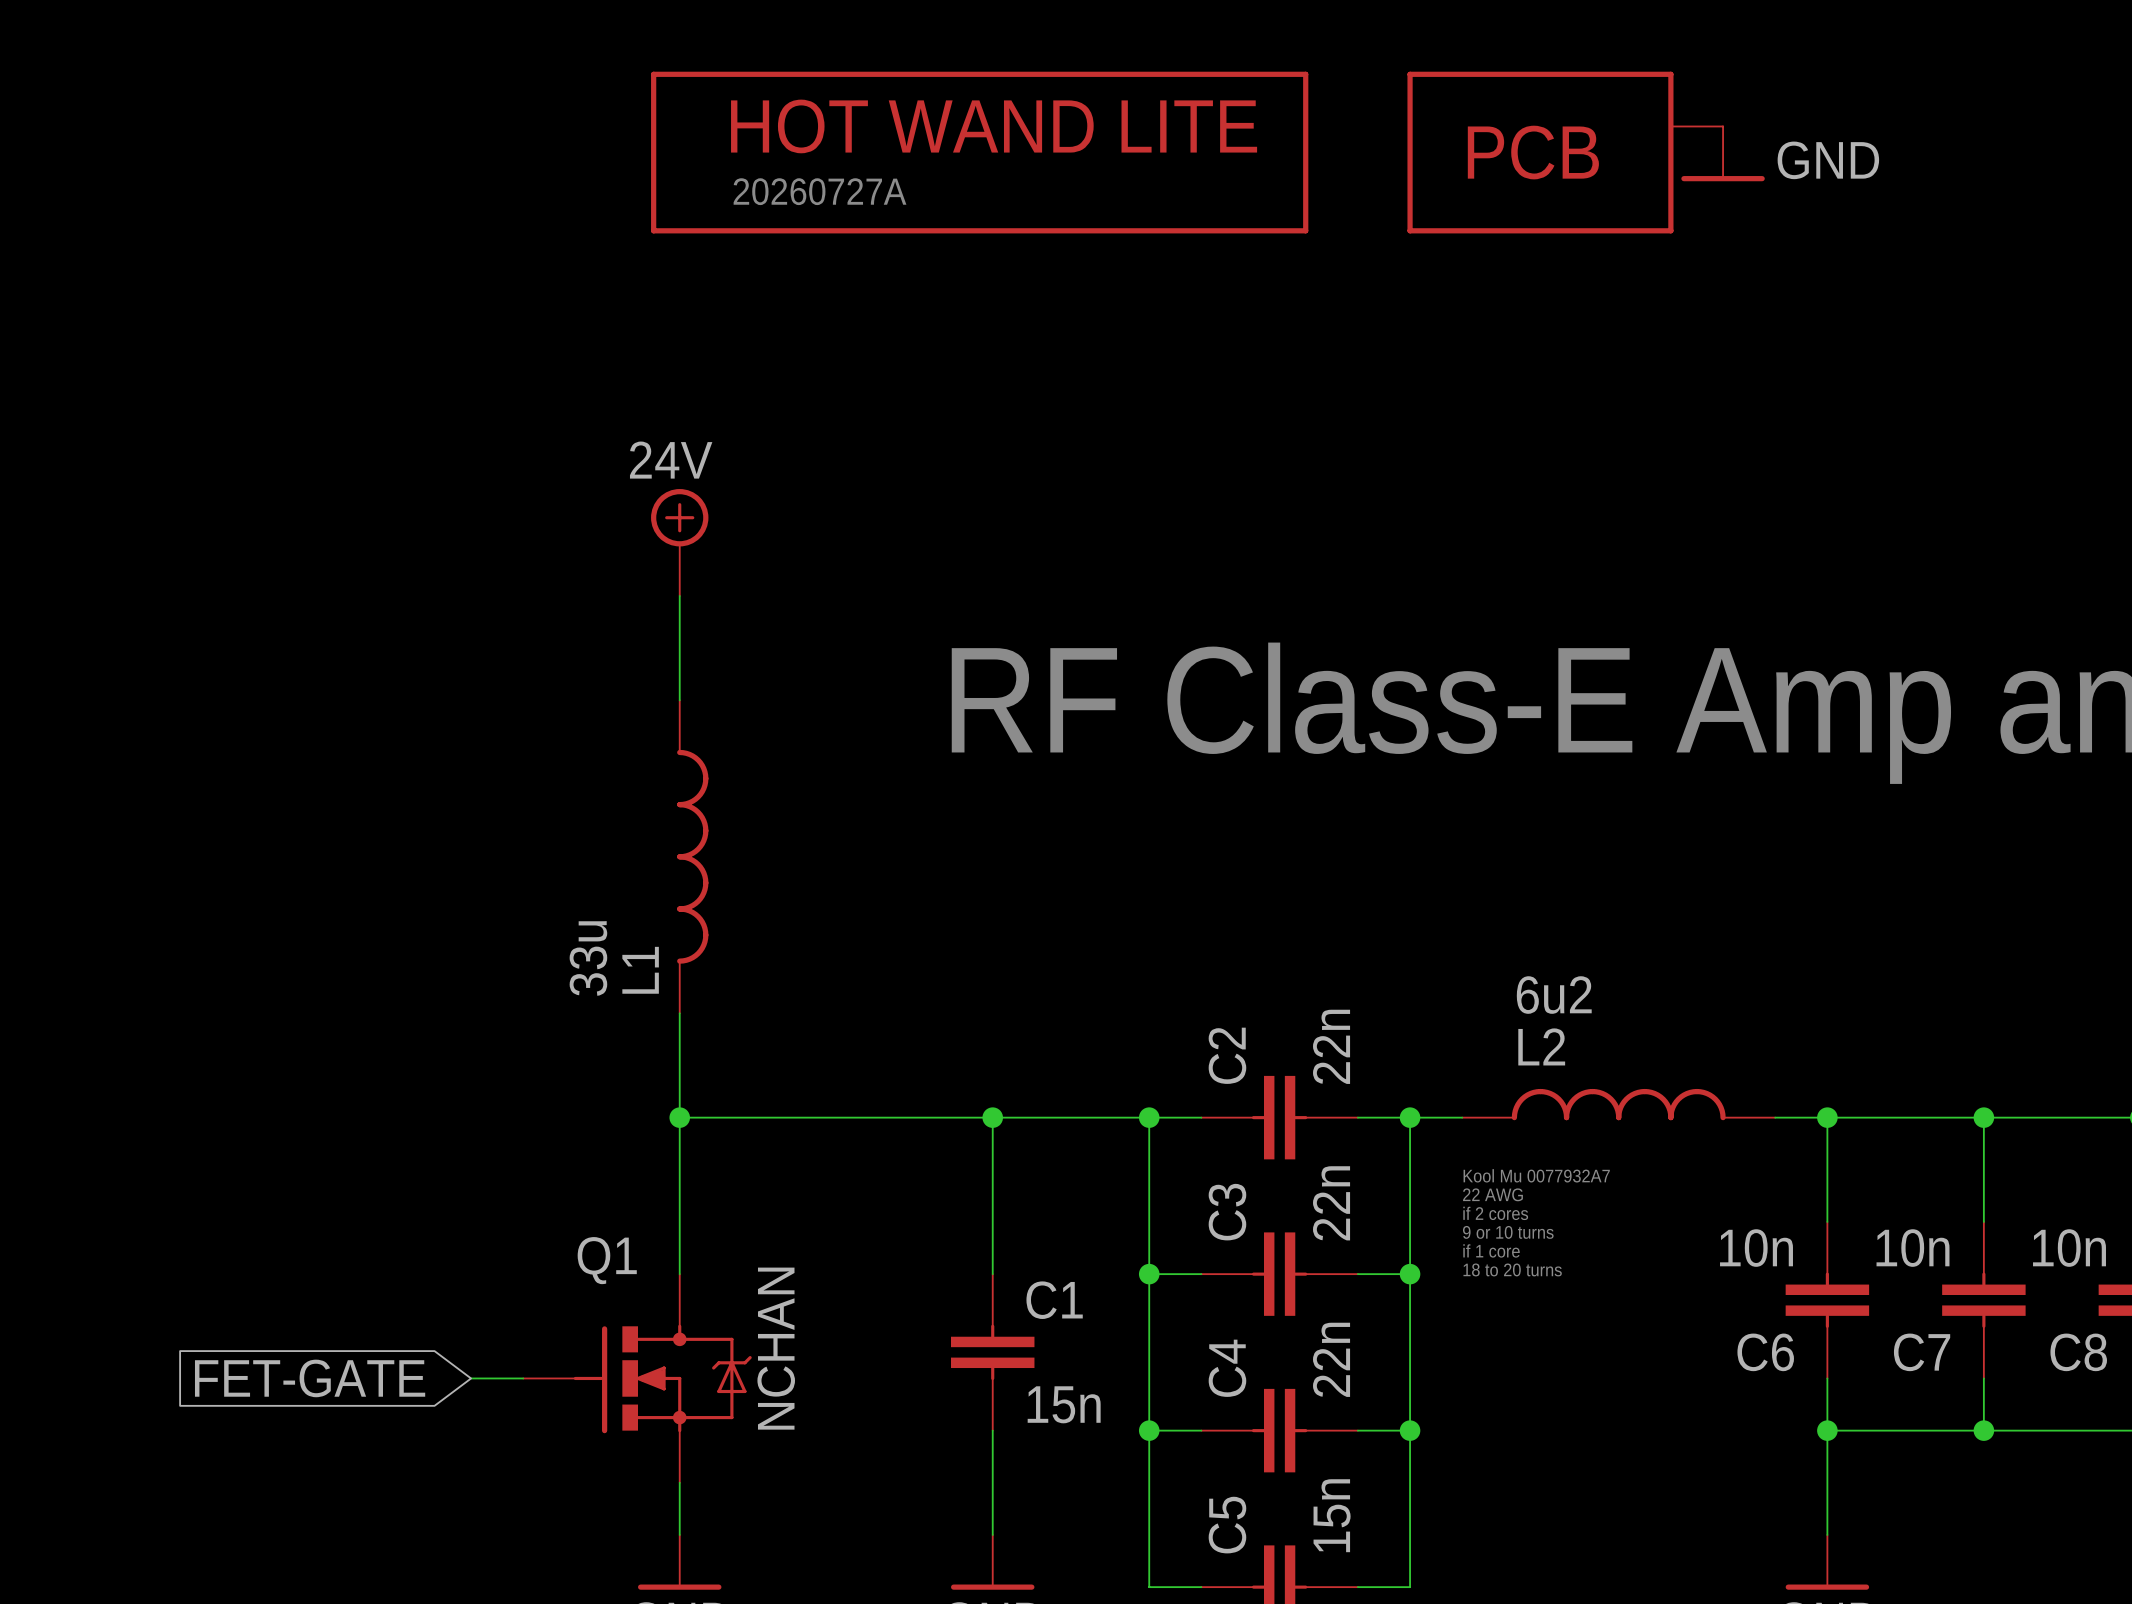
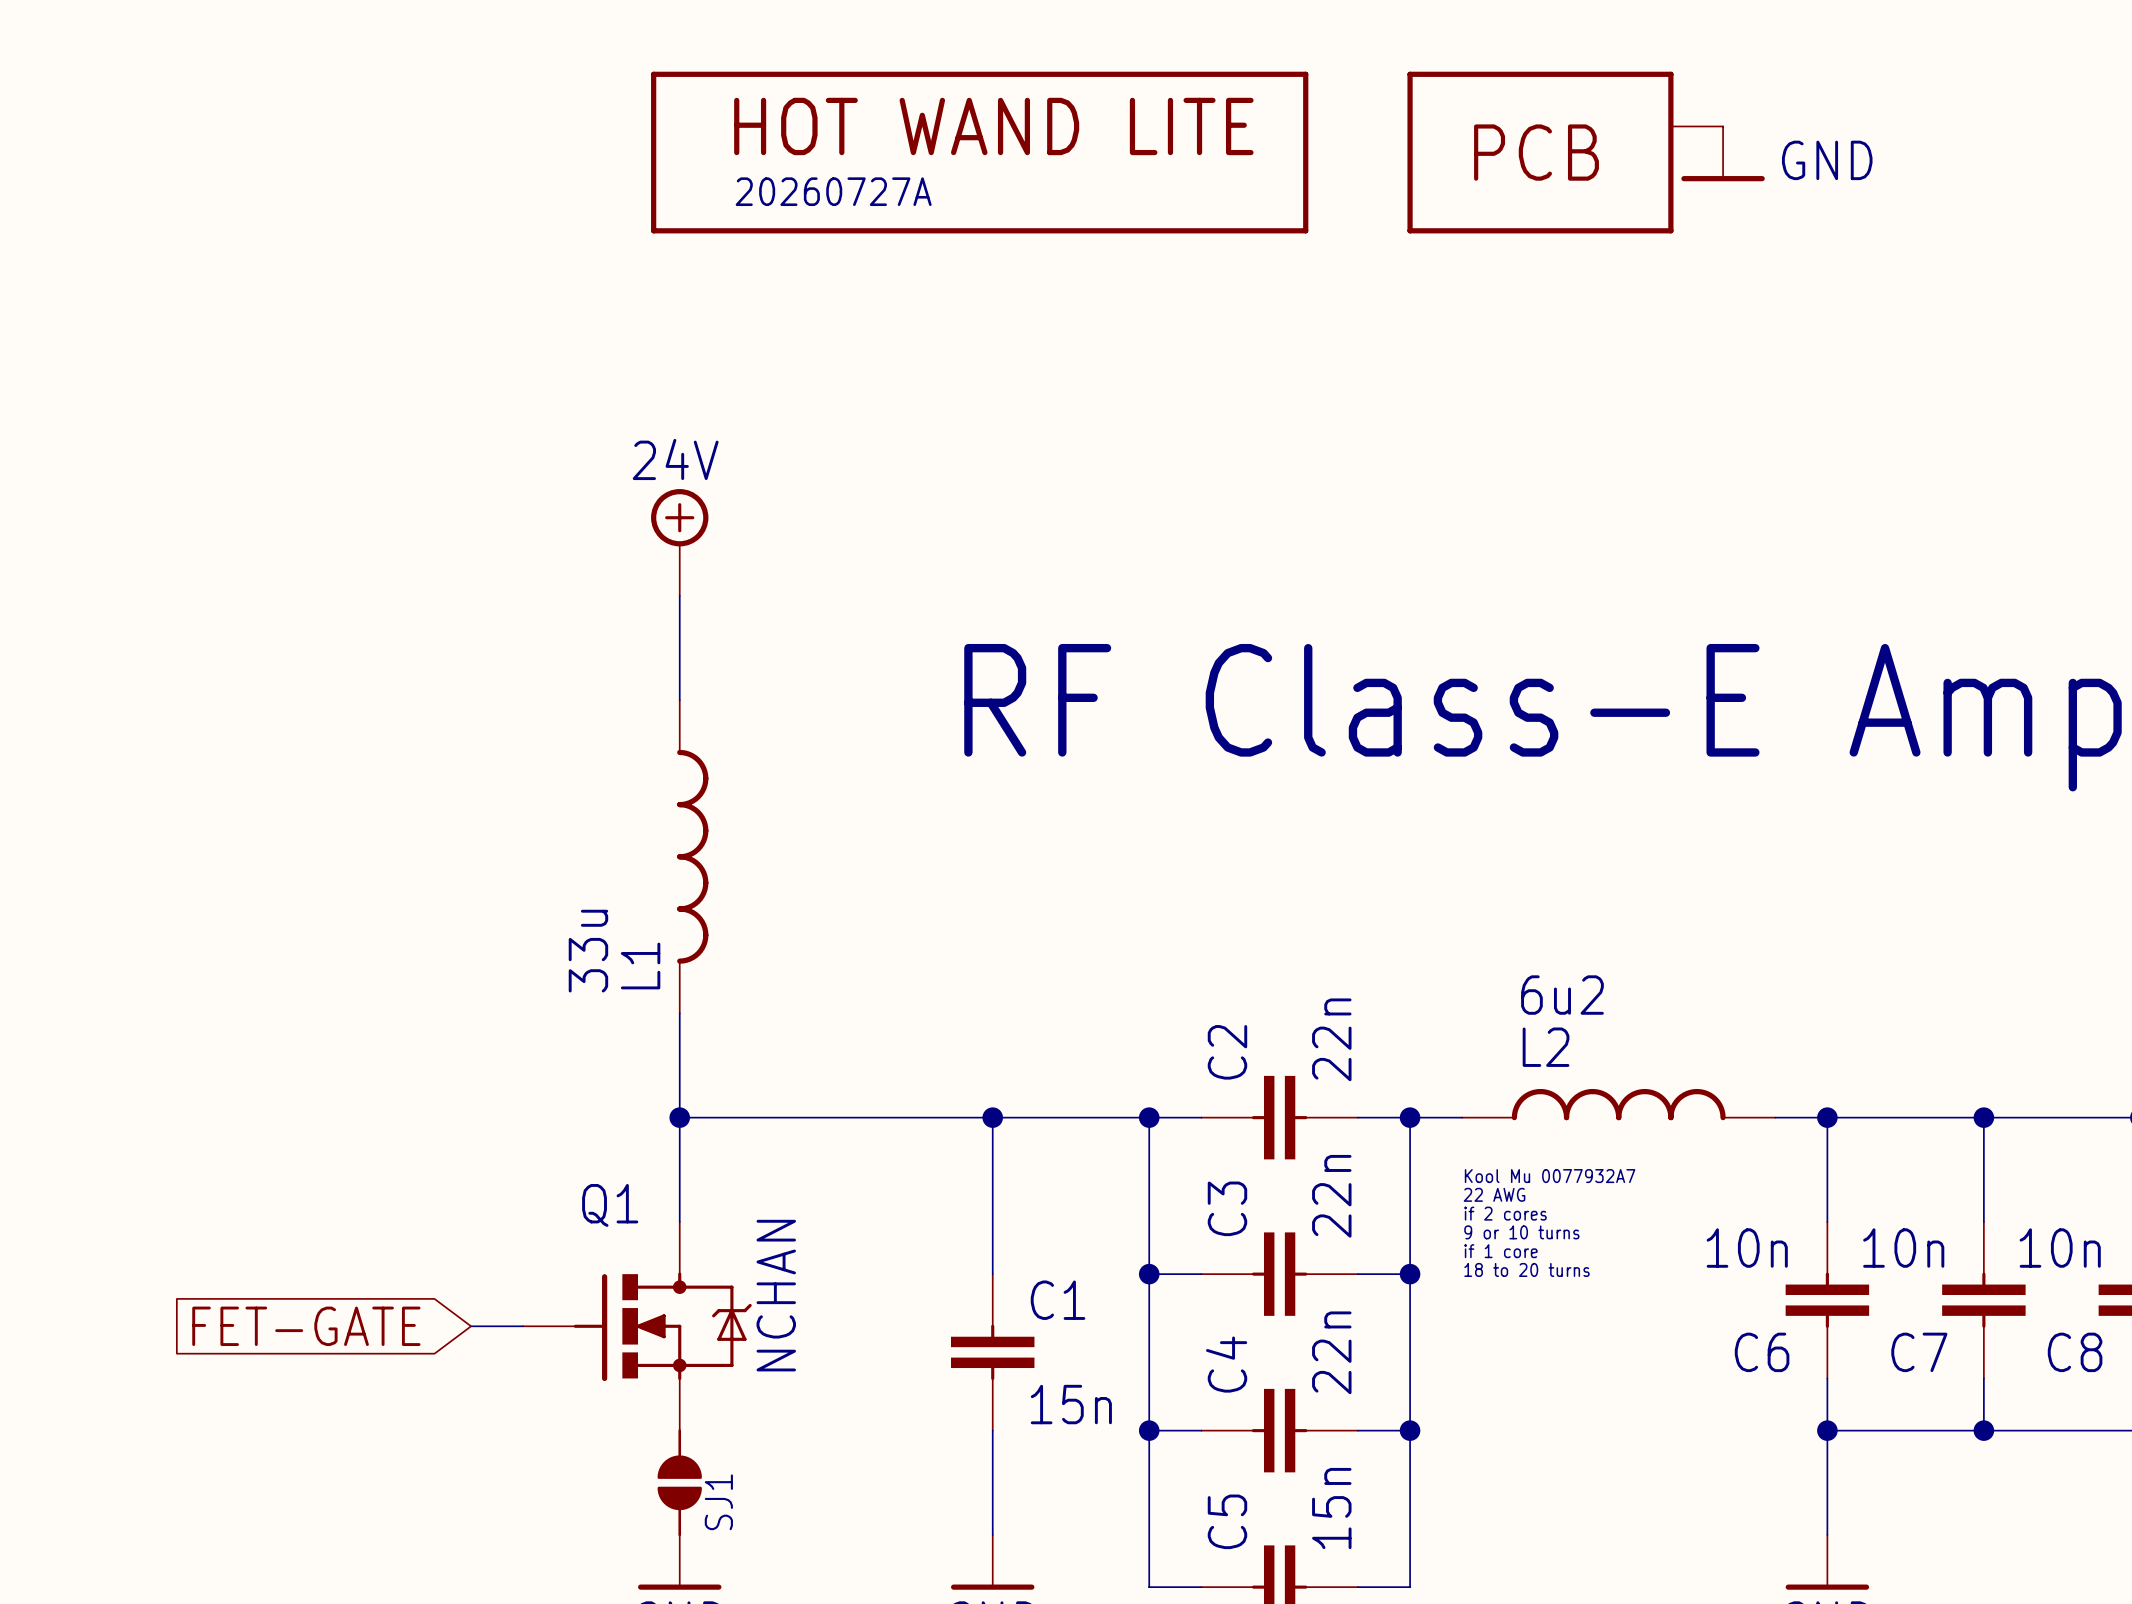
global label position: FET-GATE (310, 1378) -> FET-GATE (306, 1326)
wire: (471, 1378) (523, 1378) -> (471, 1326) (523, 1326)
Q1 position: (637, 1378) -> (637, 1326)
SJ1: none -> (679, 1482)

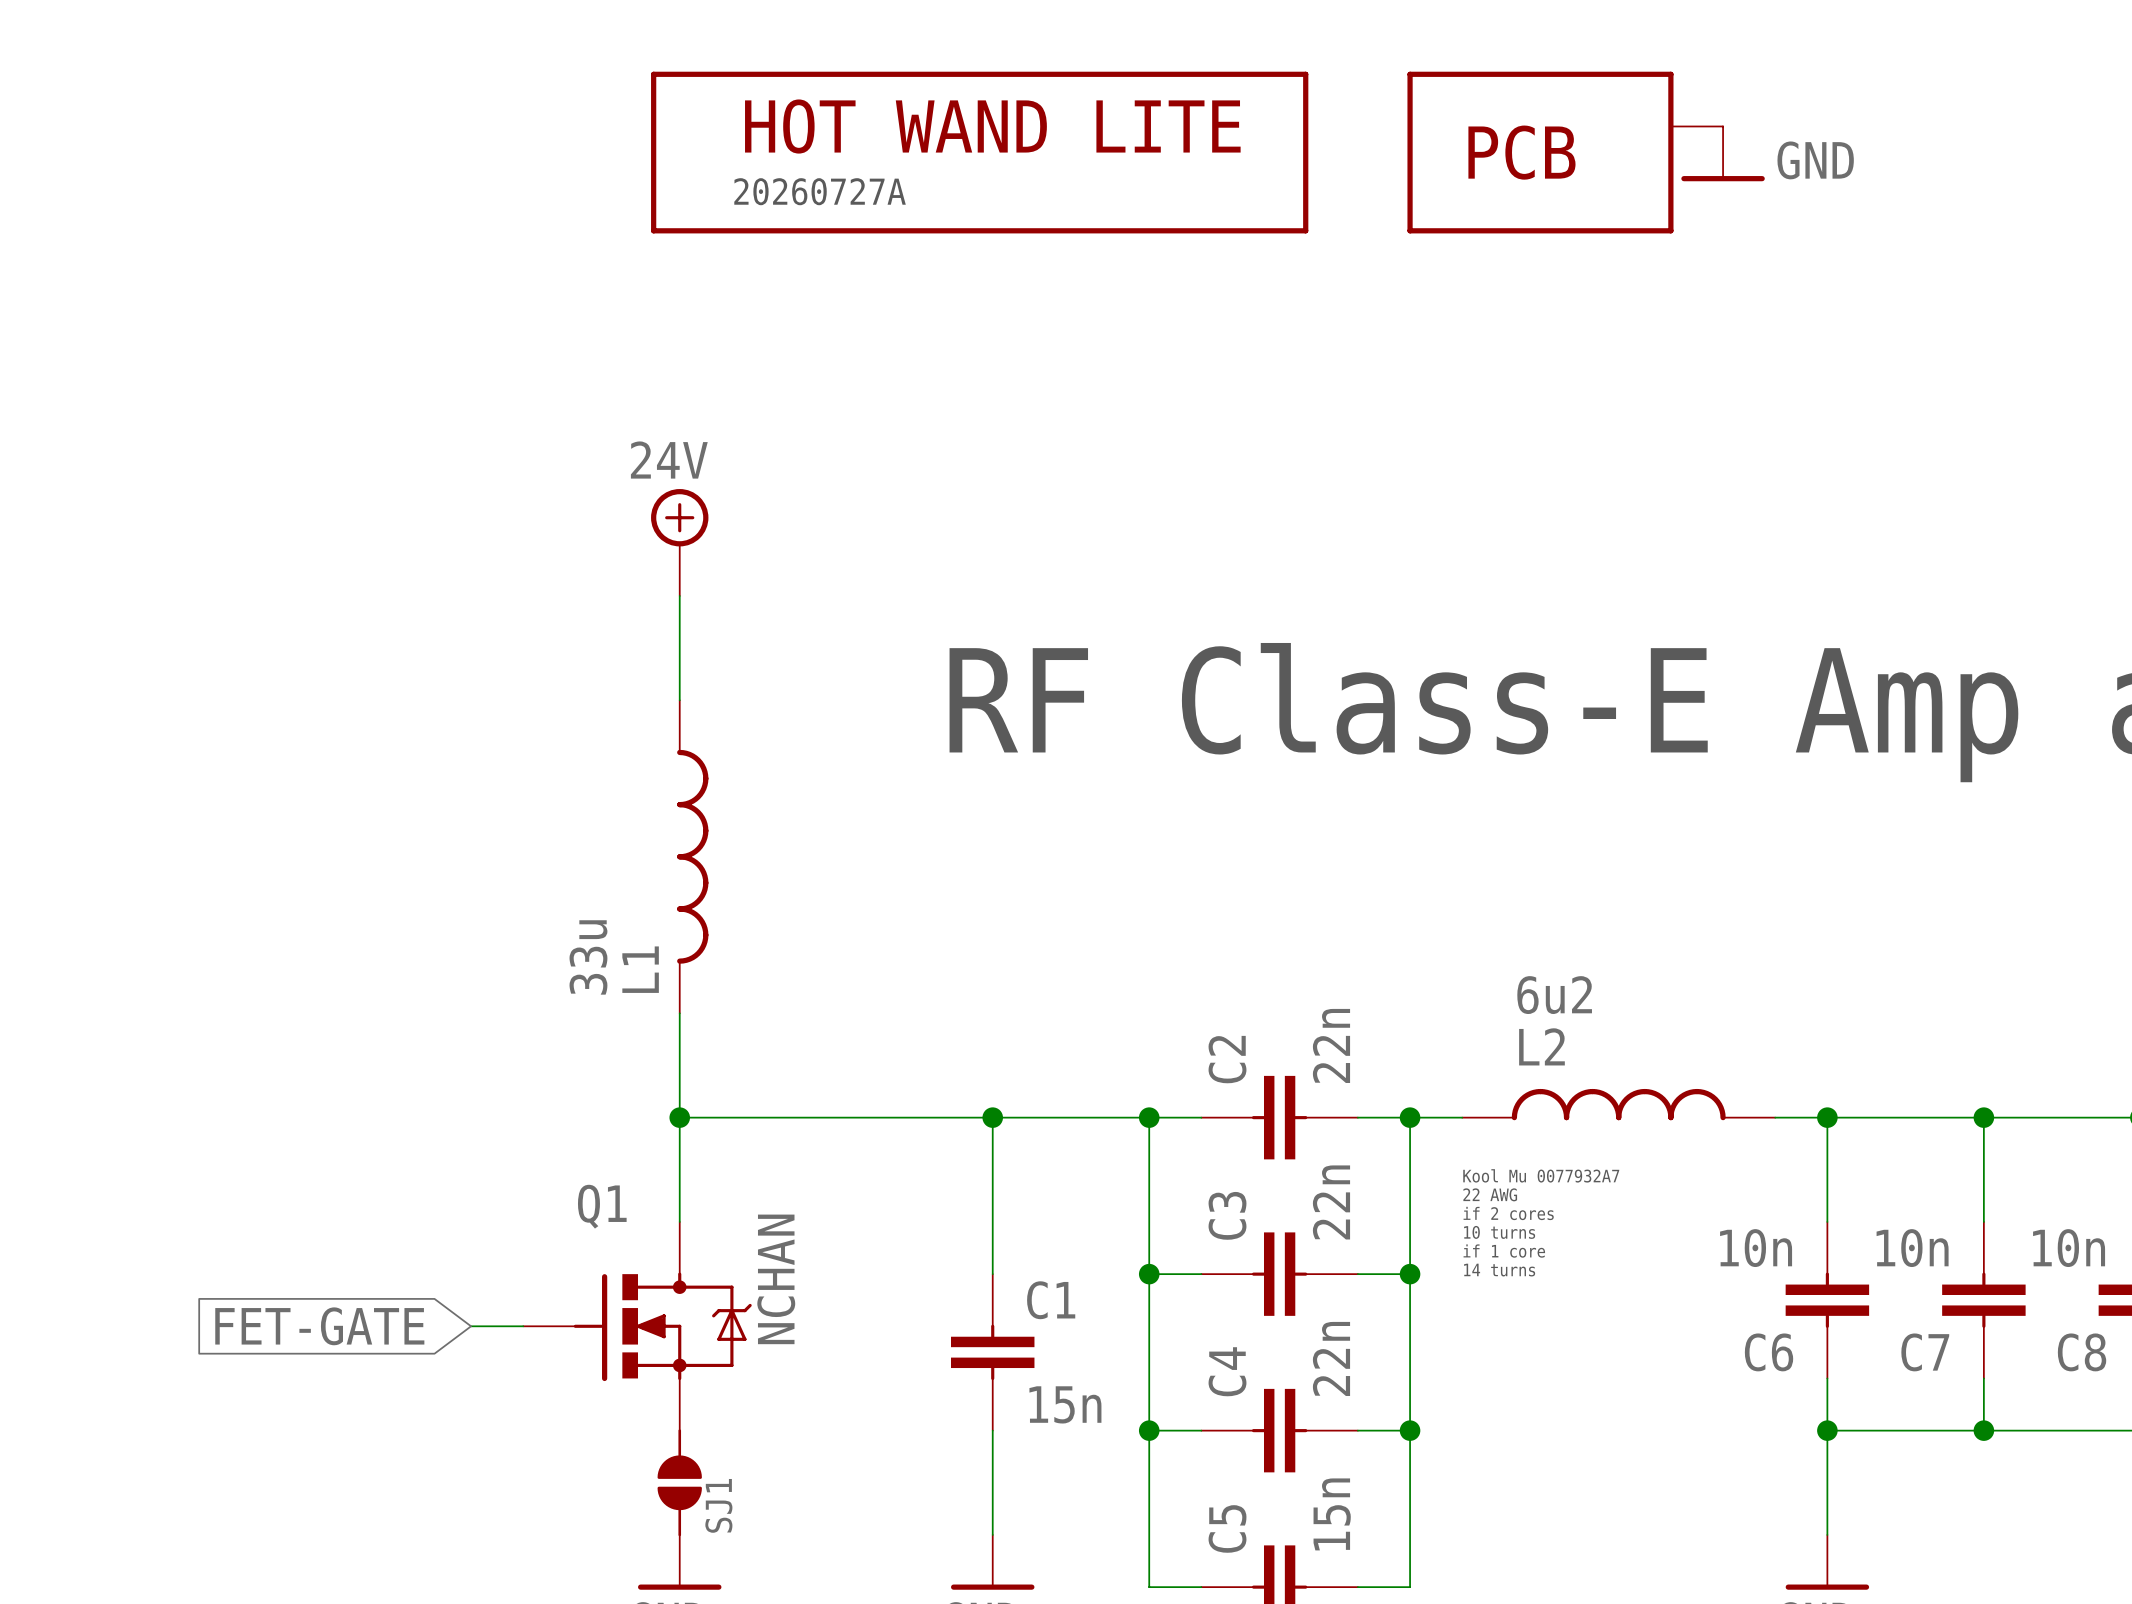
text: 9 or 10 turns (1521, 1232) -> 10 turns (1499, 1232)
text: 18 to 20 turns (1527, 1269) -> 14 turns (1499, 1270)

